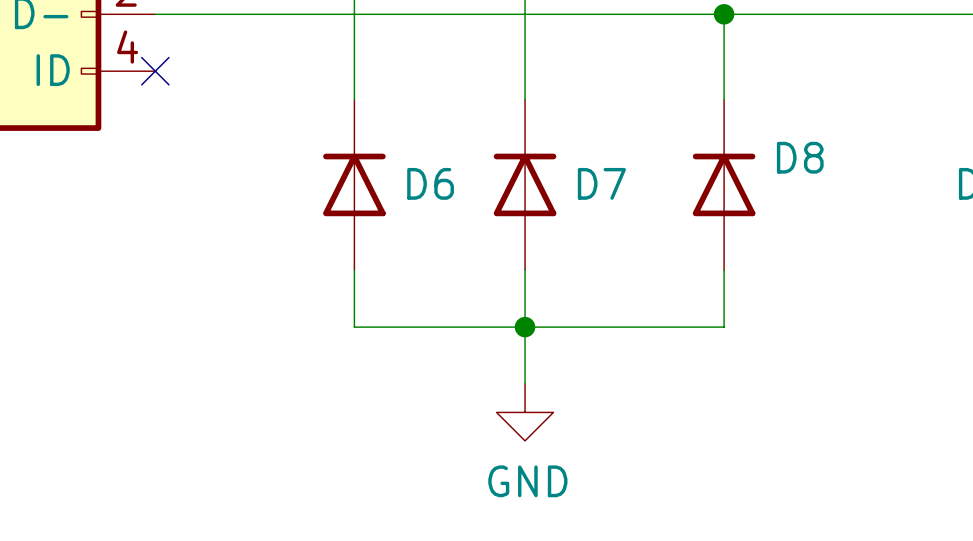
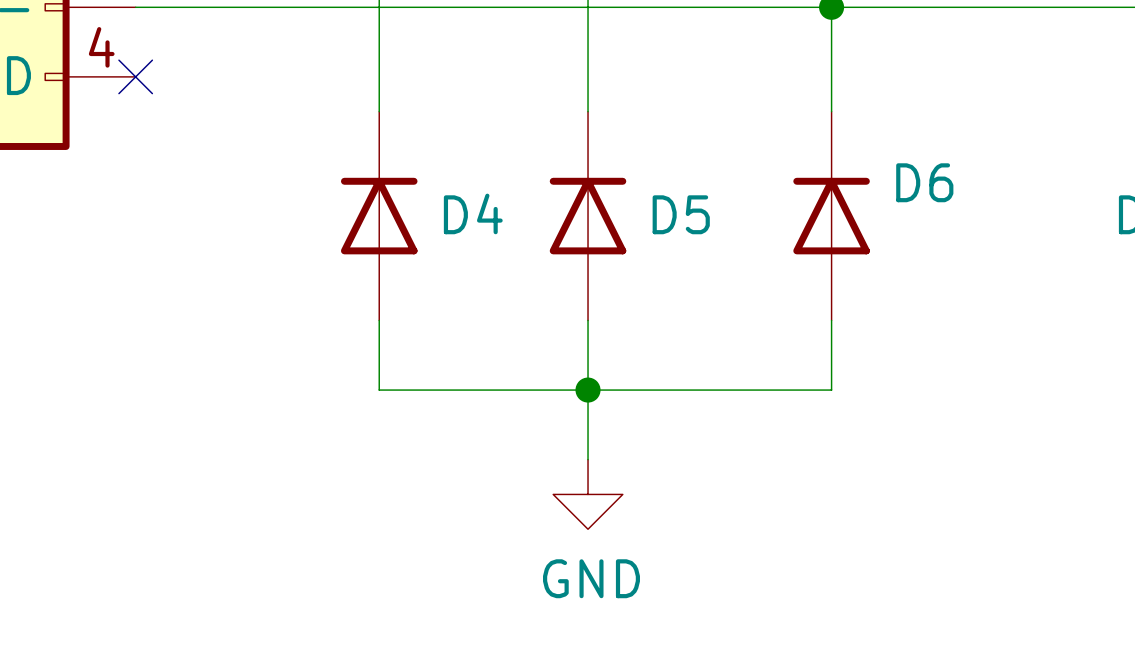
D8 name: D8 (800, 157) -> D6 (924, 182)
D6 name: D6 (430, 183) -> D4 (473, 213)
D7 name: D7 (601, 183) -> D5 (681, 214)

